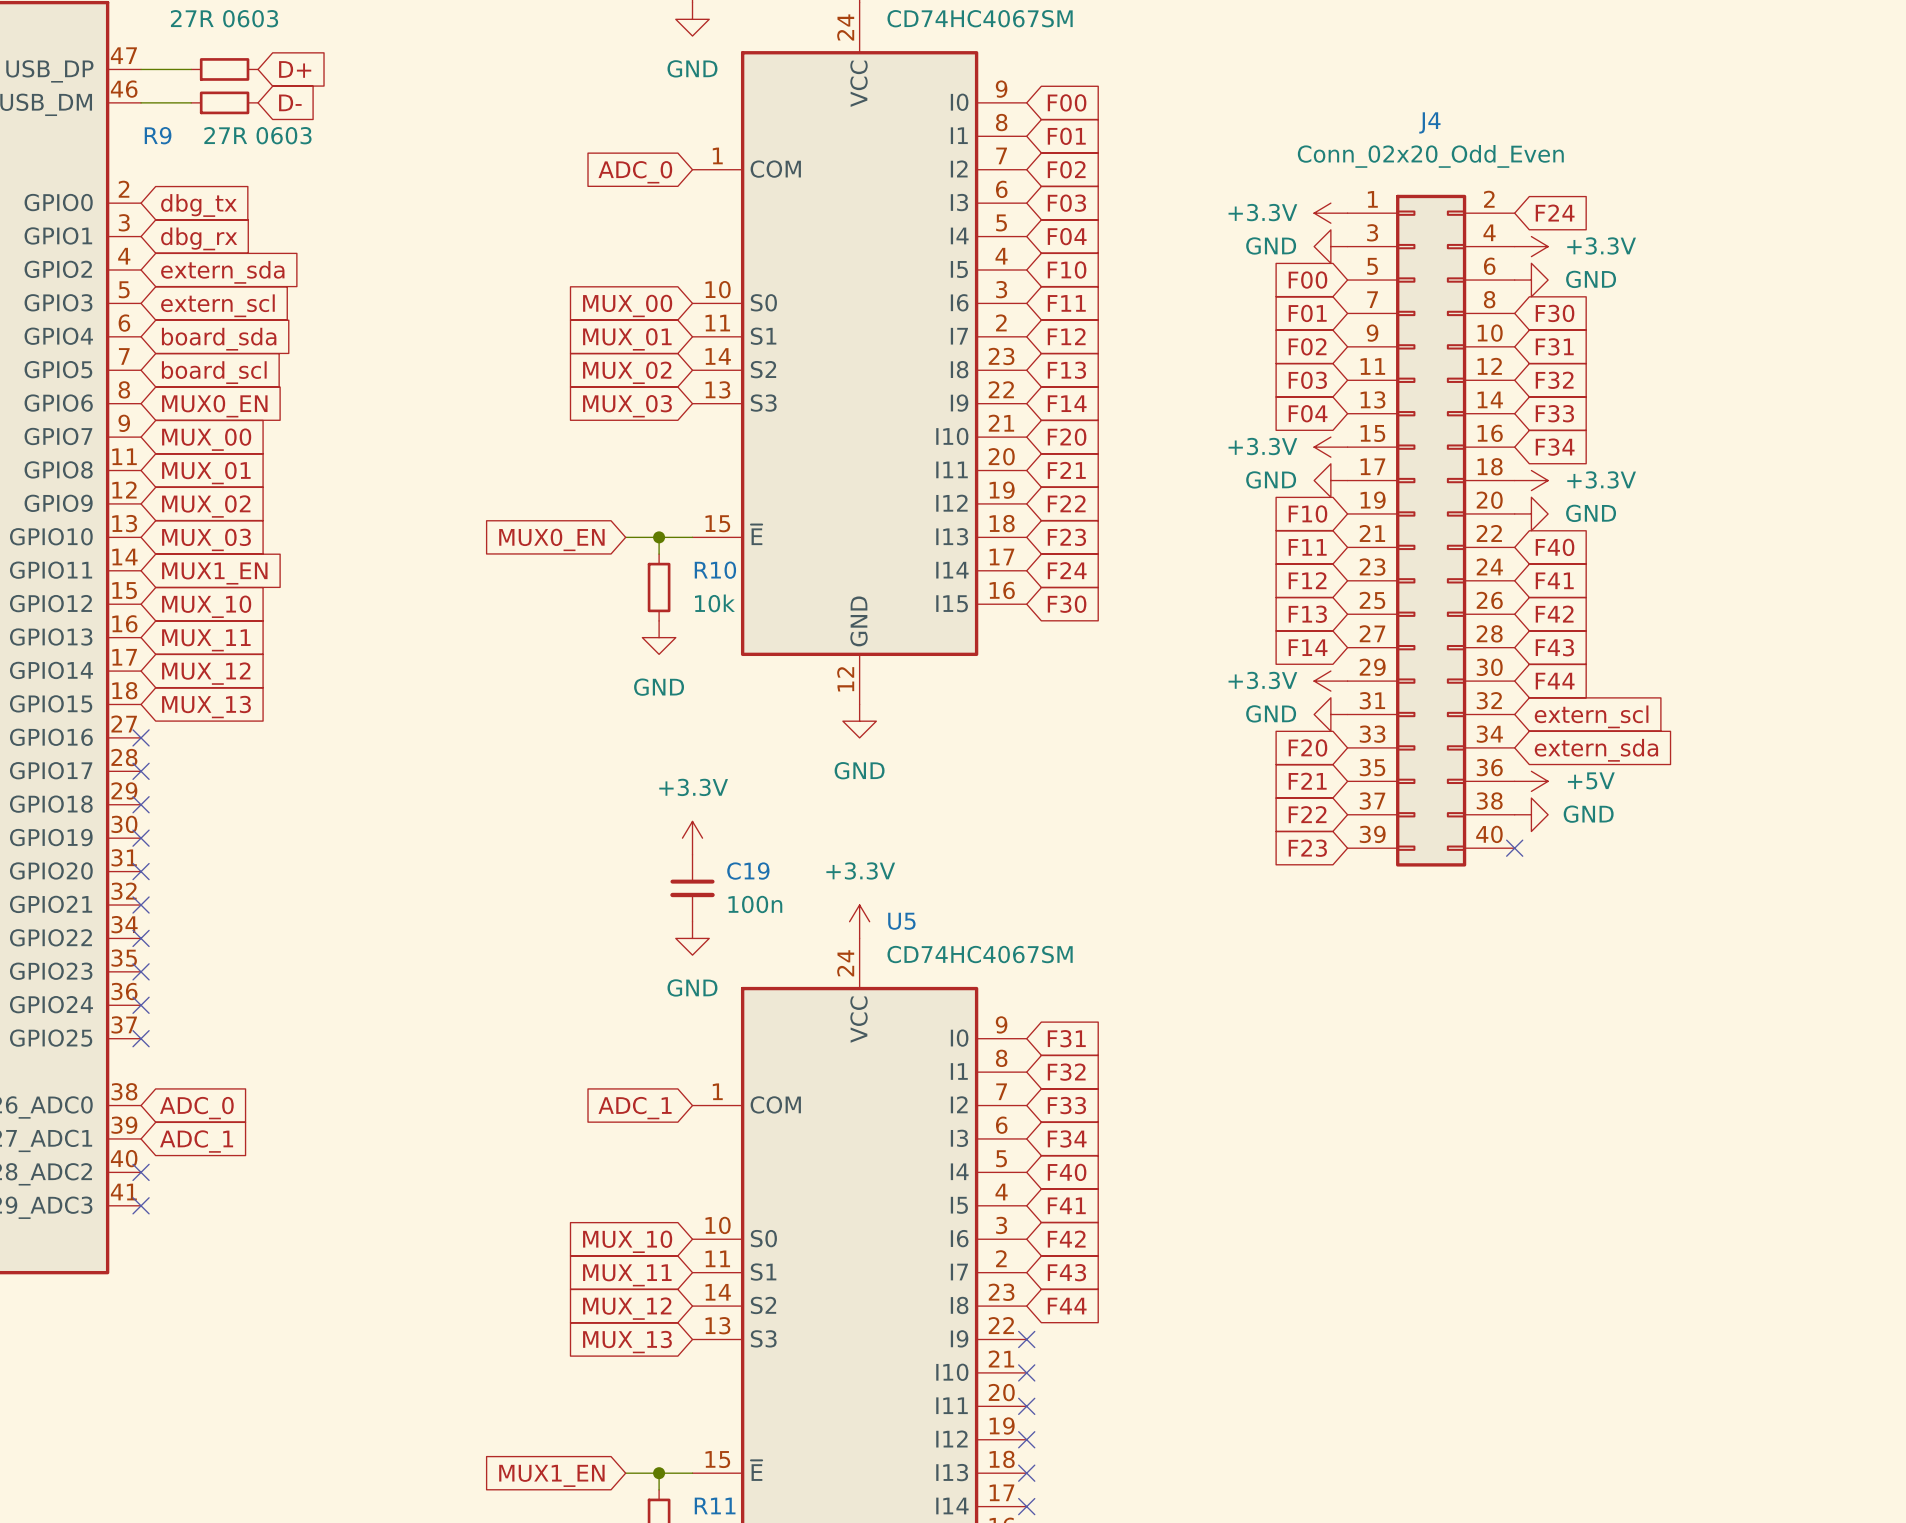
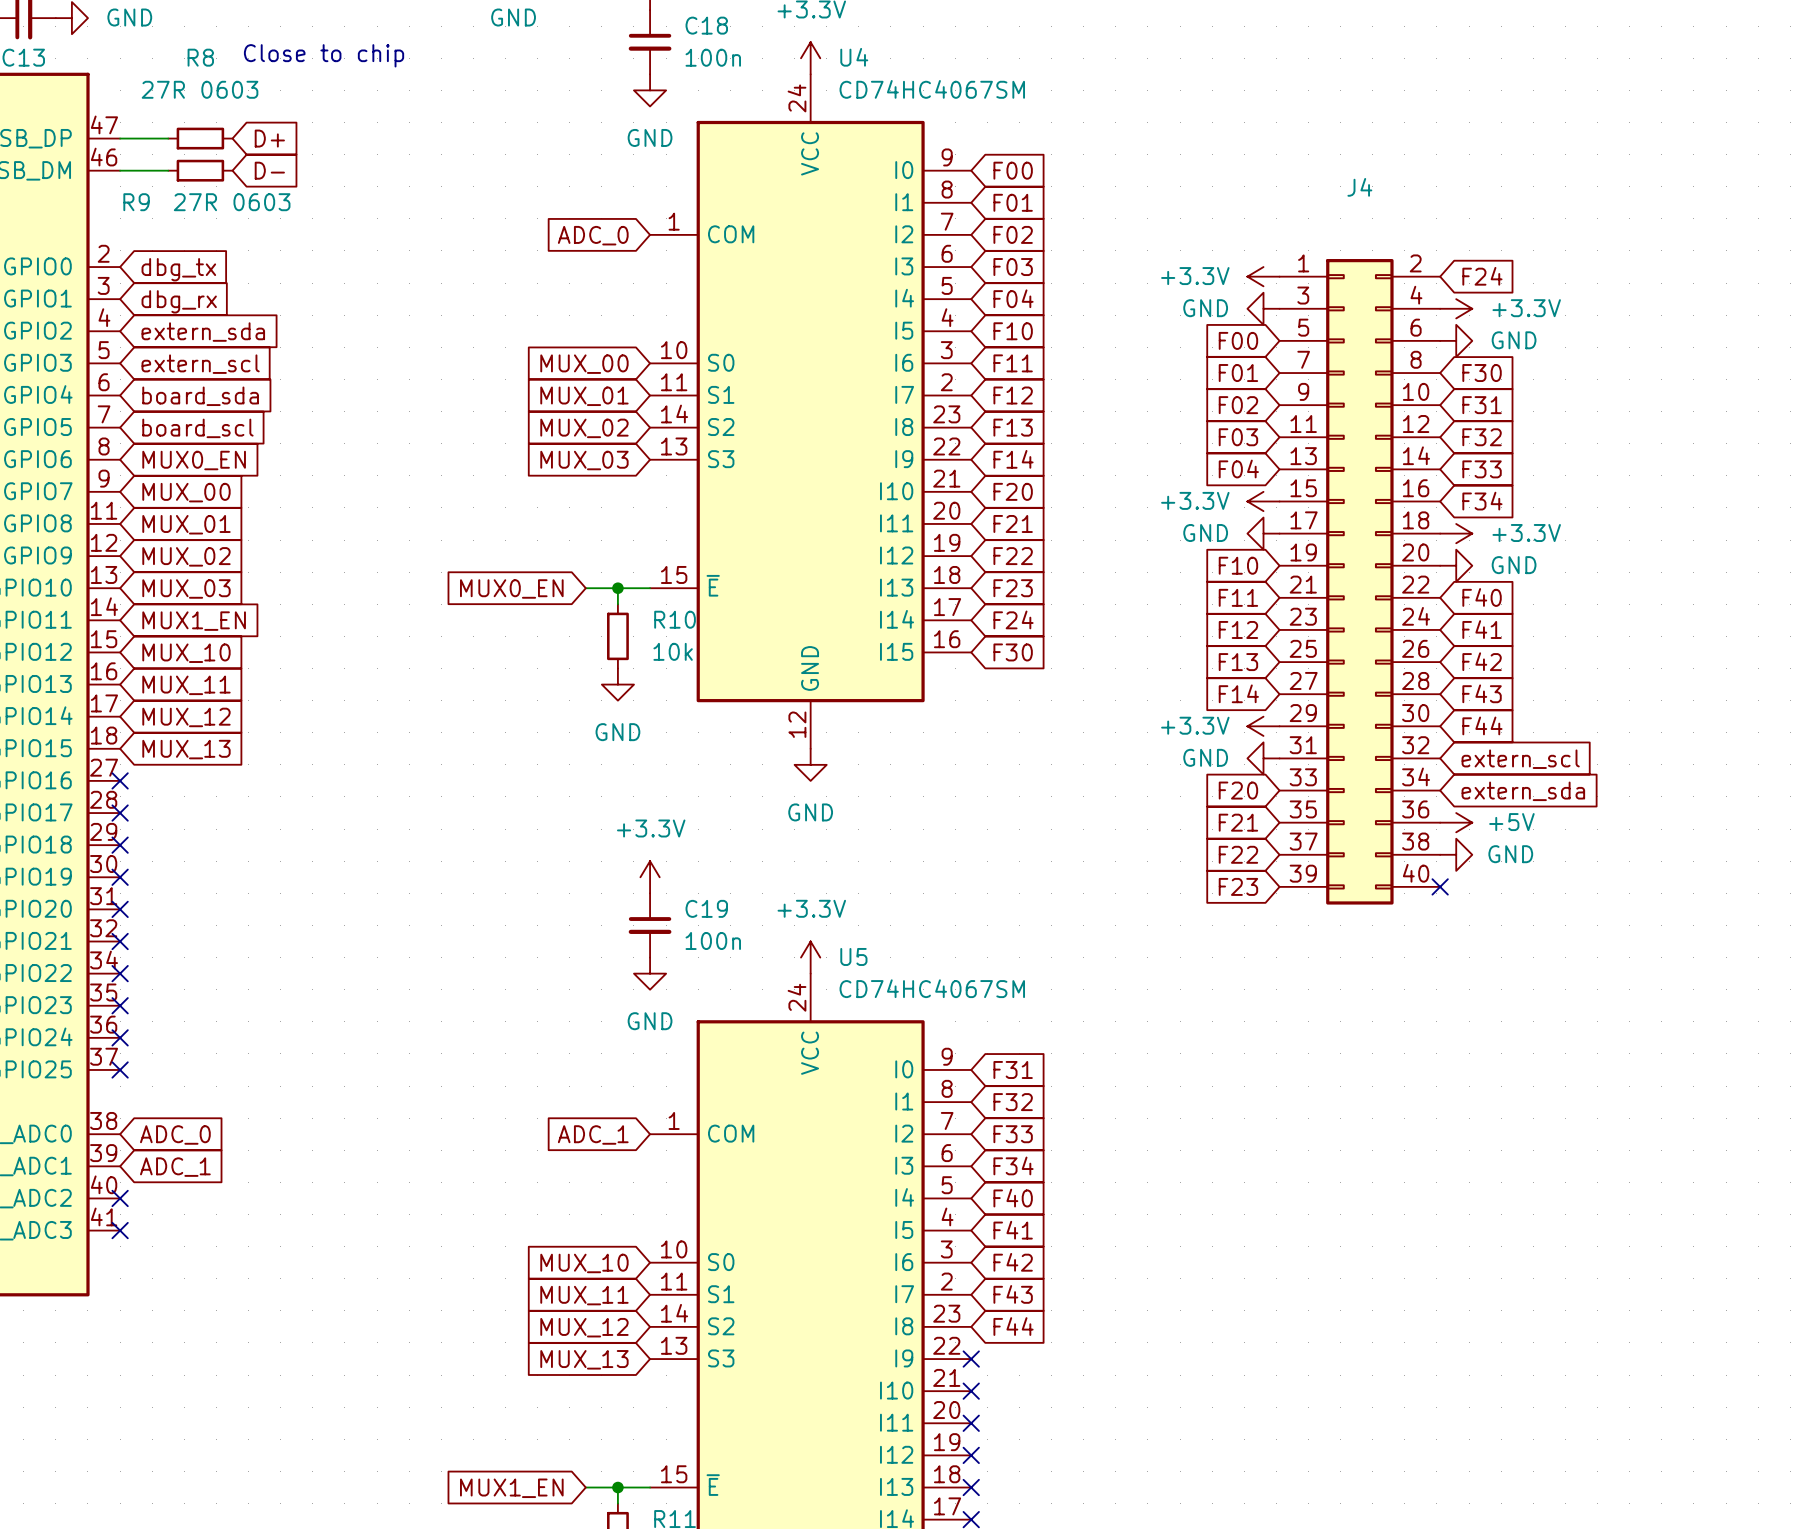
J4 value: Conn_02x20_Odd_Even (1430, 156) -> none

